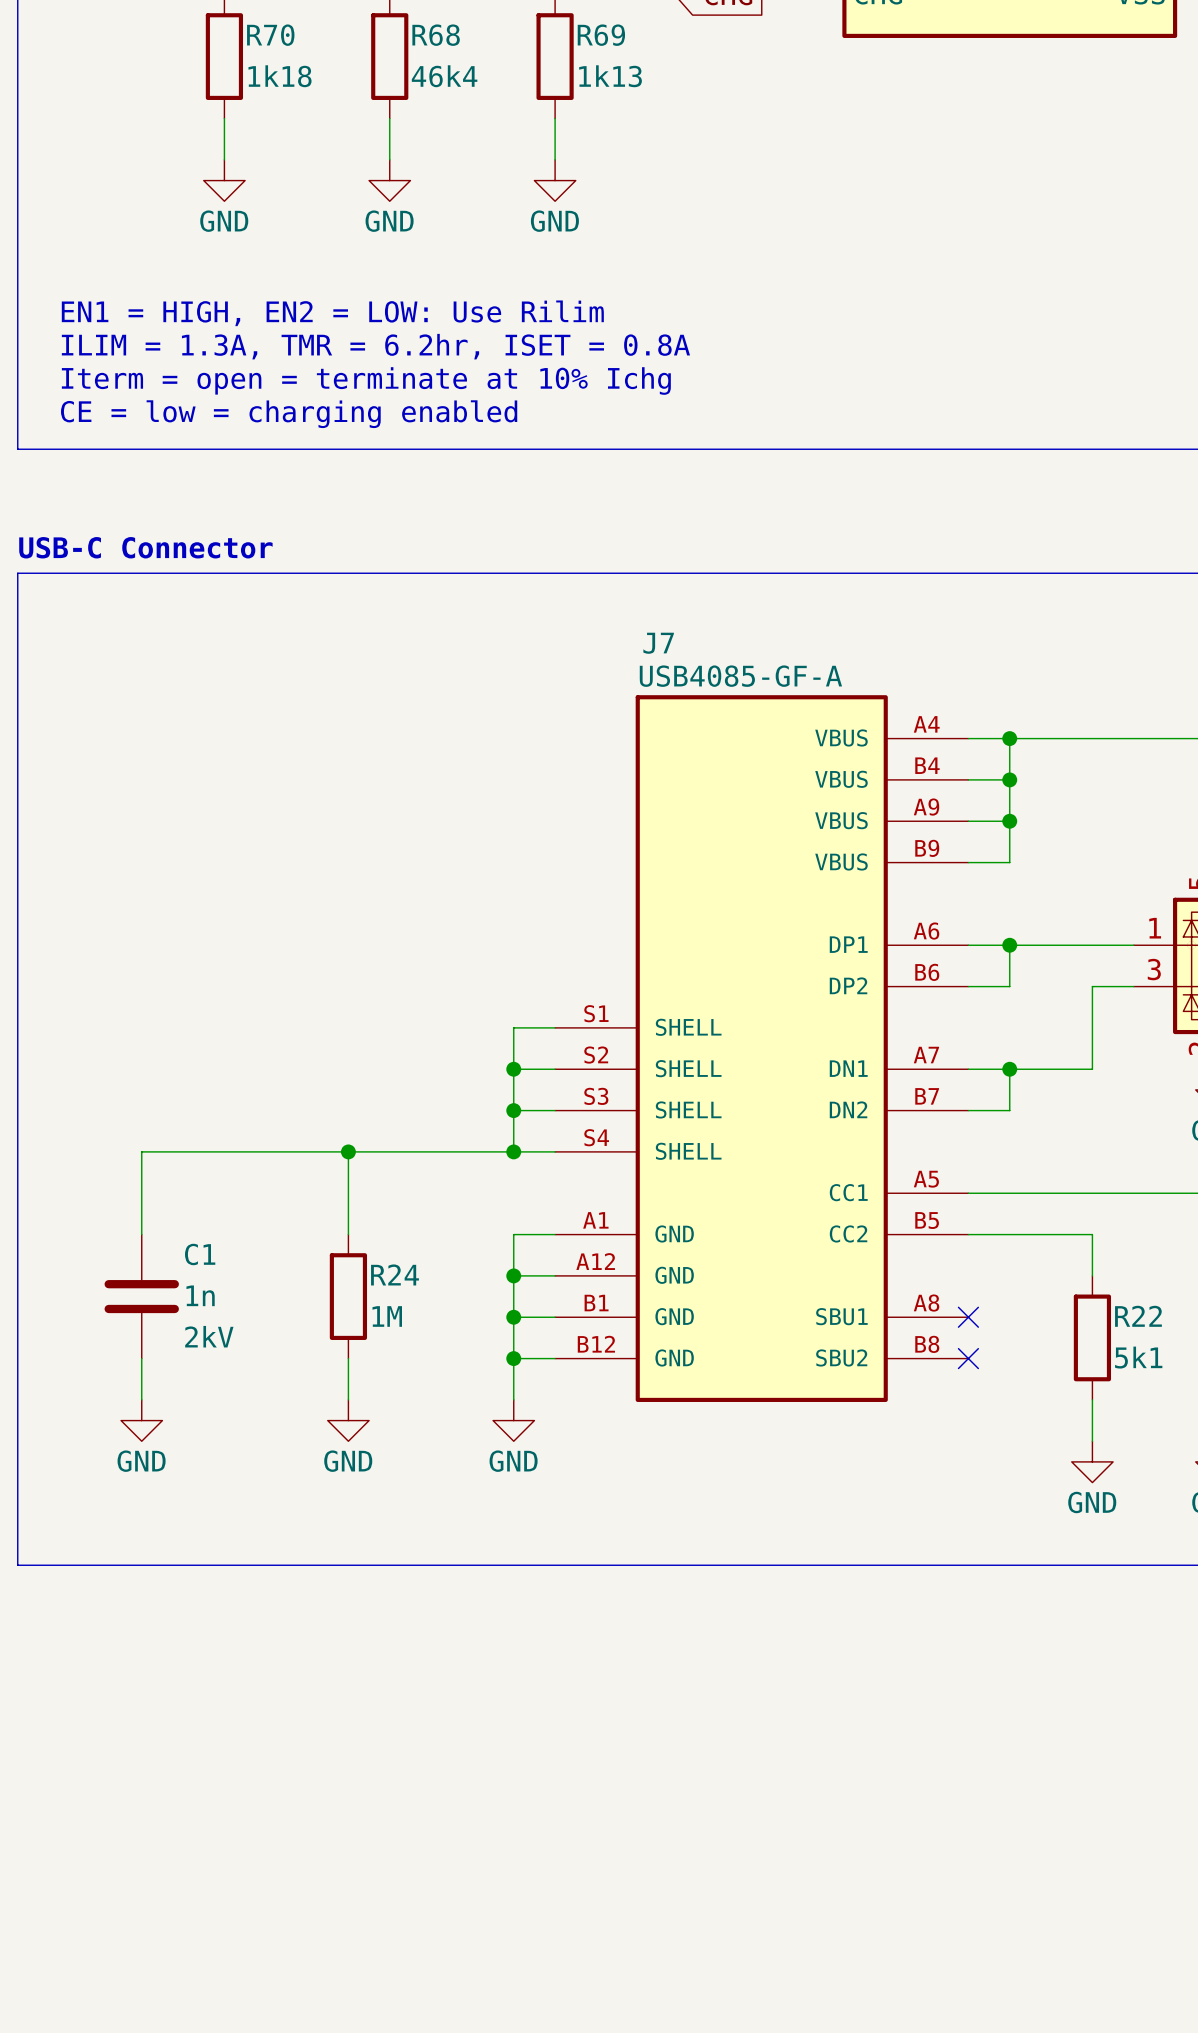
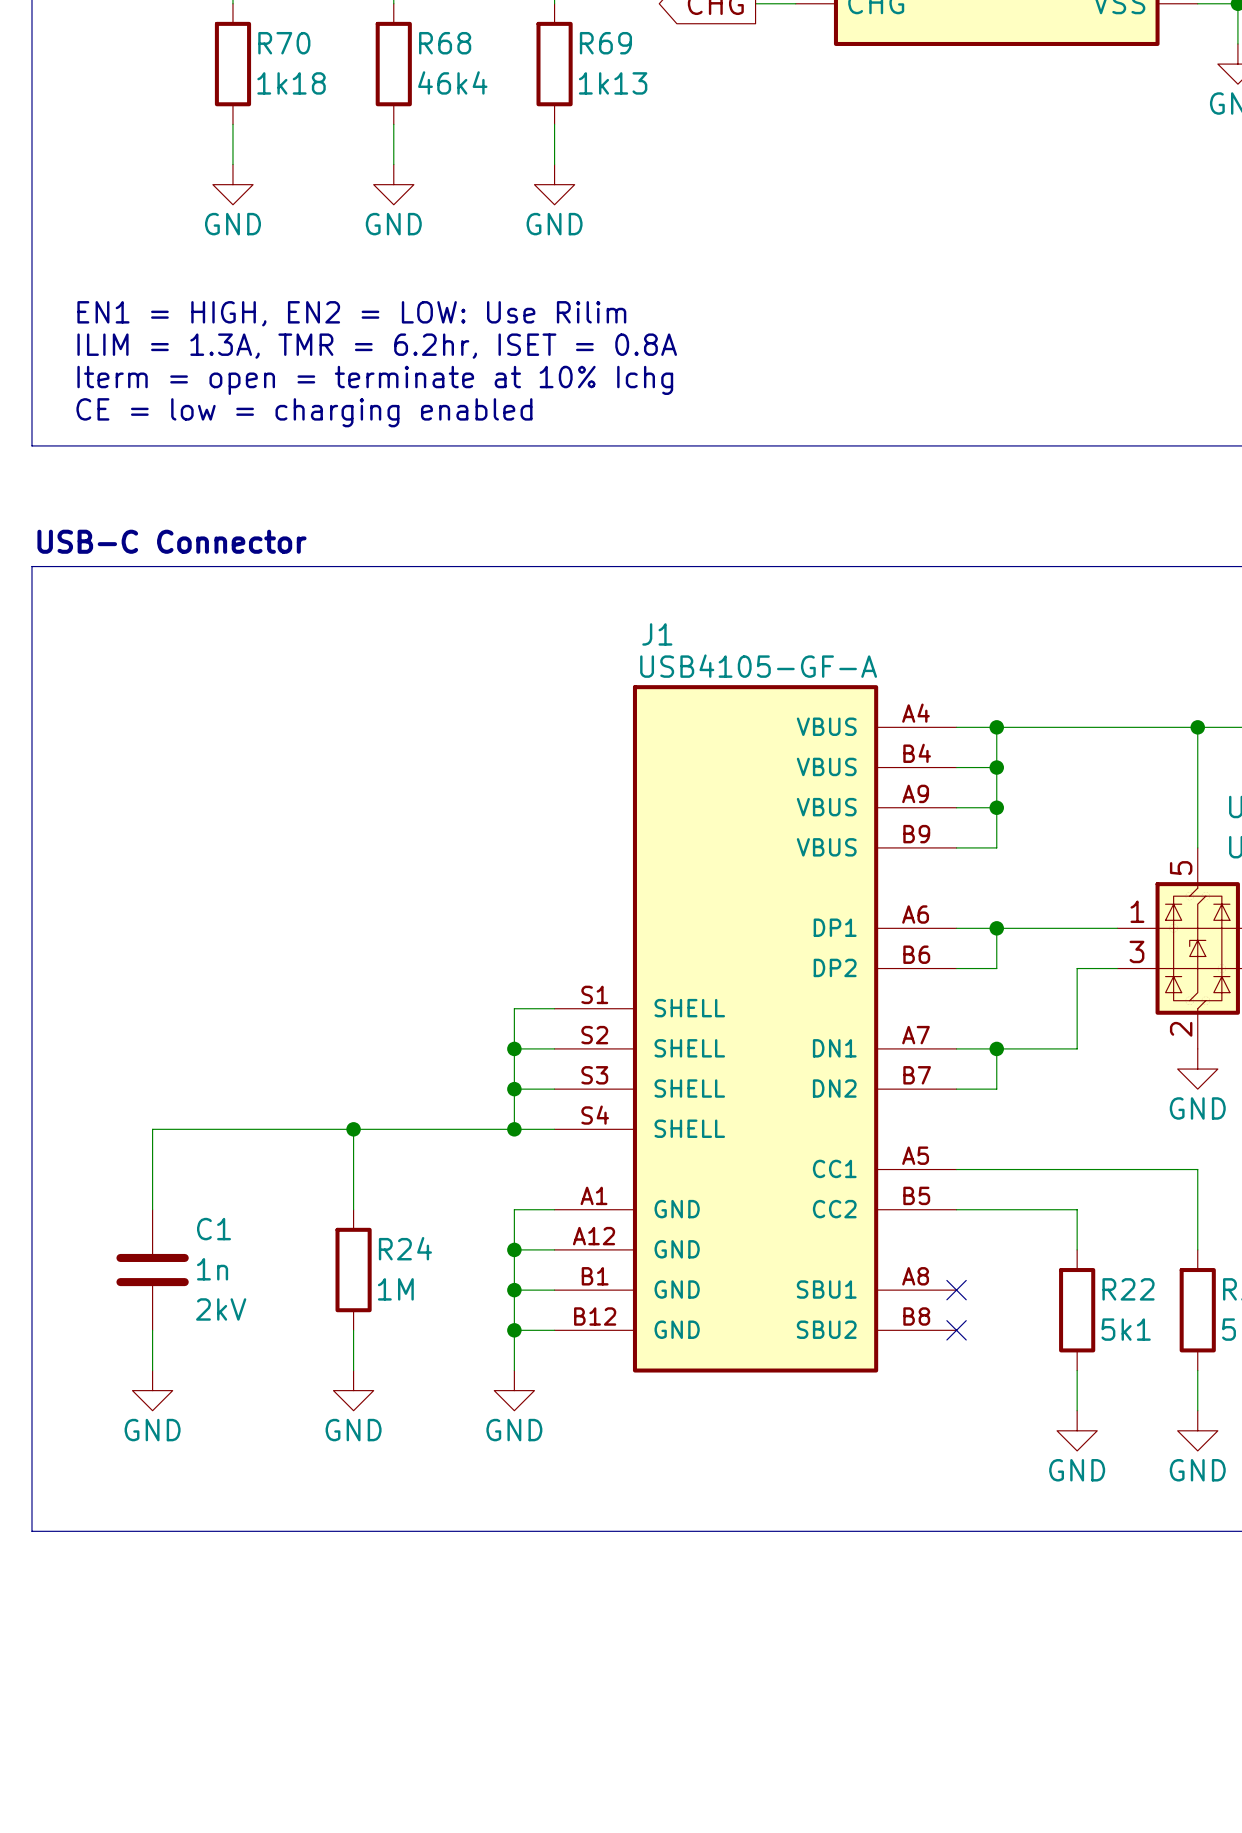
J7 name: J7 (658, 643) -> J1 (657, 634)
J7 value: USB4085-GF-A (740, 676) -> USB4105-GF-A (758, 666)

